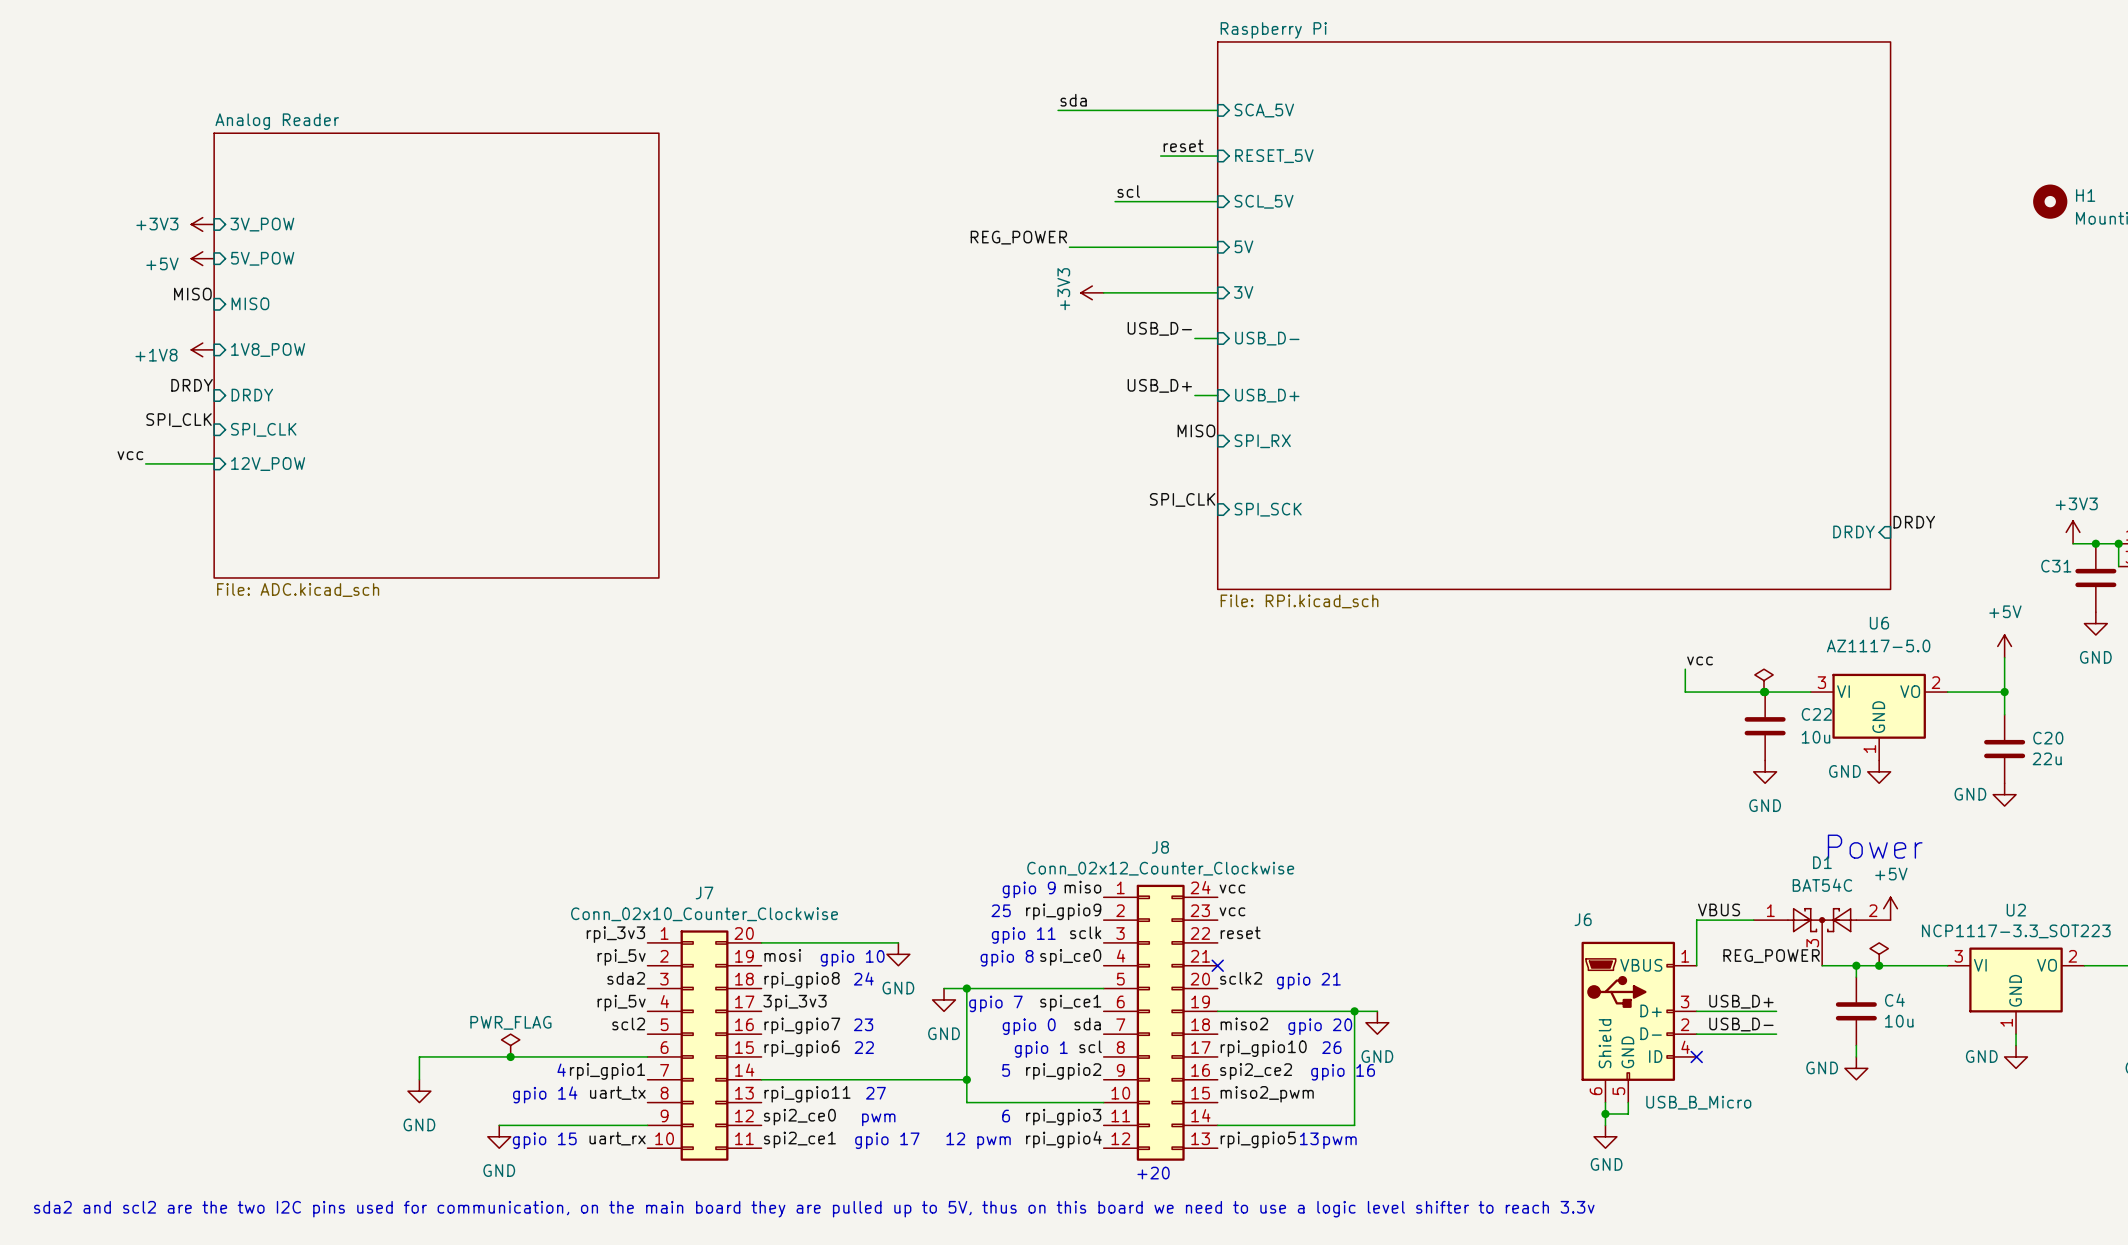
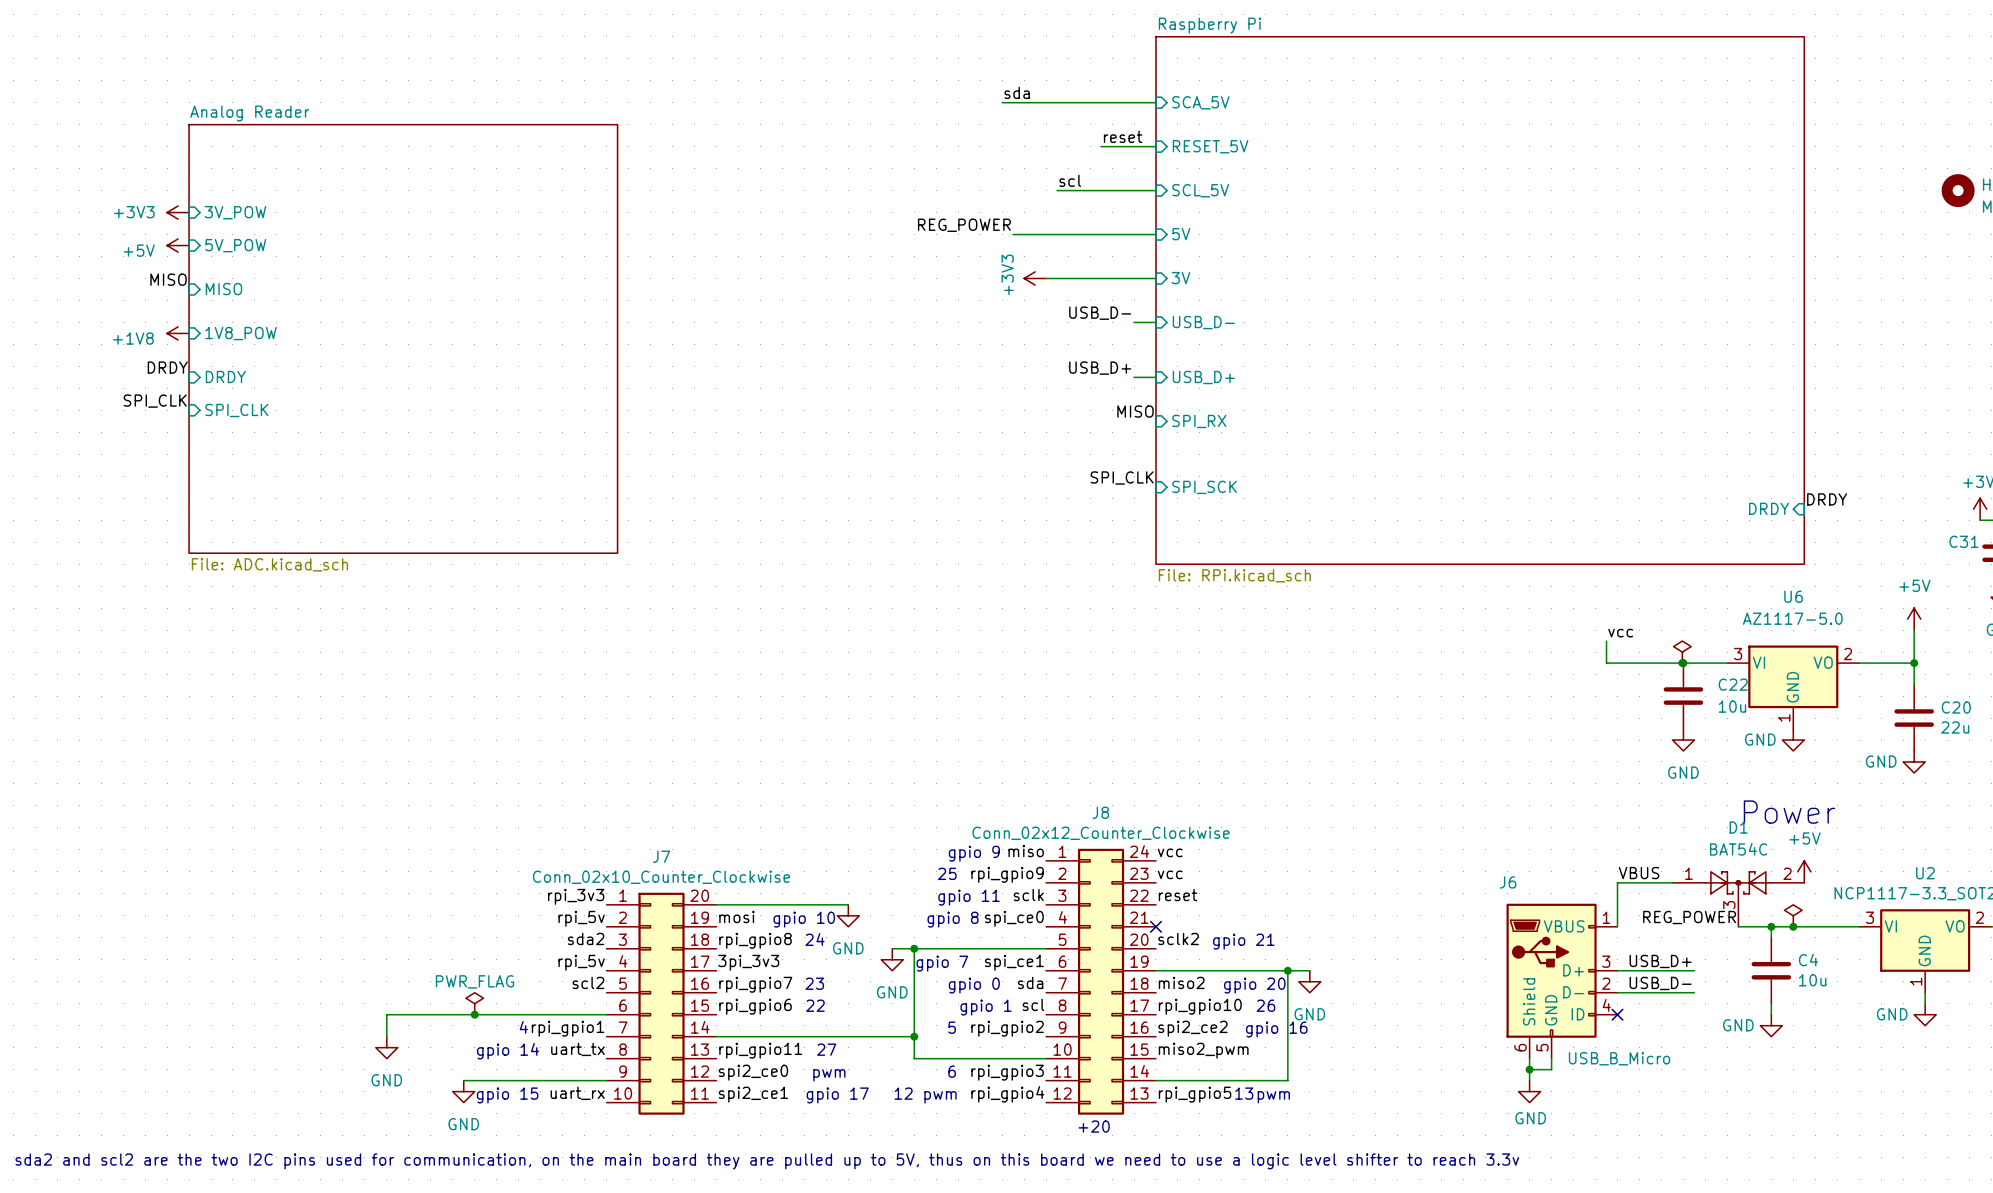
label: vcc (130, 455) -> none
wire: (145, 463) (214, 463) -> none
sheet pin: 12V_POW (268, 464) -> none

